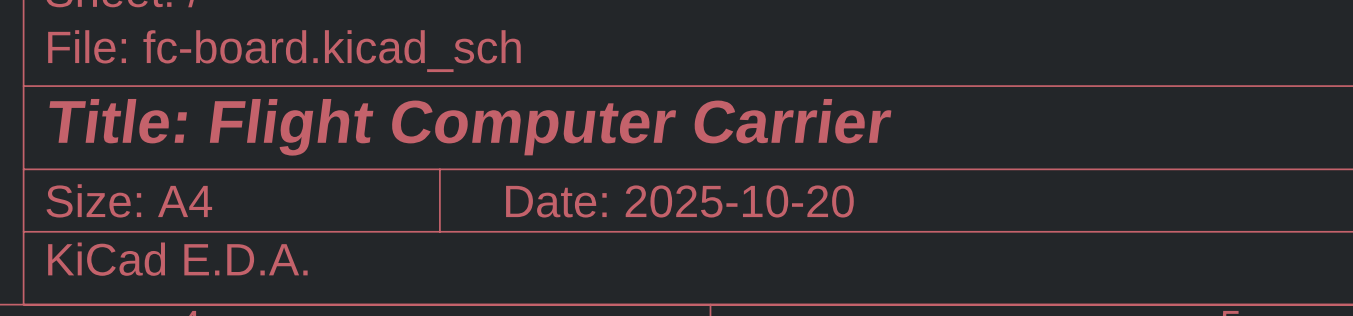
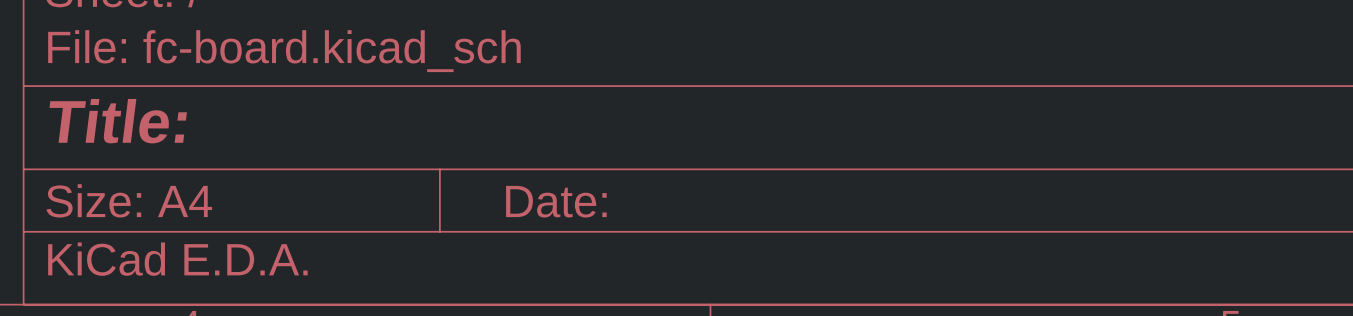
title block: Title: Flight Computer Carrier (470, 127) -> Title: (118, 121)
title block: Date: 2025-10-20 (679, 201) -> Date: (556, 201)

